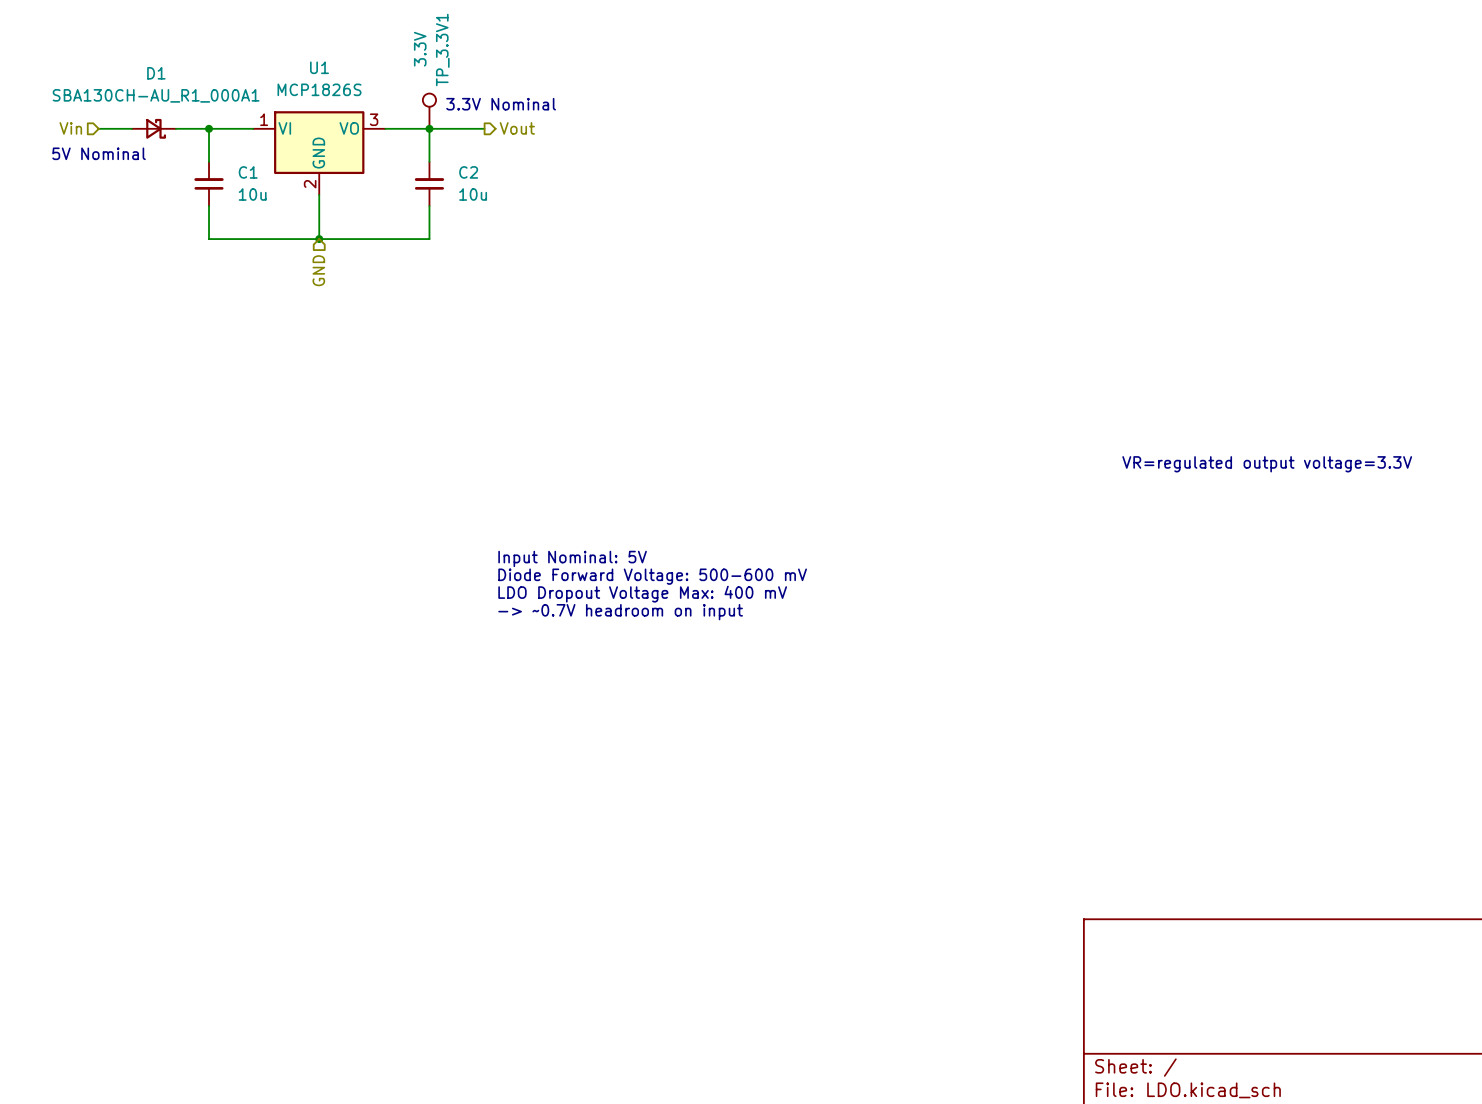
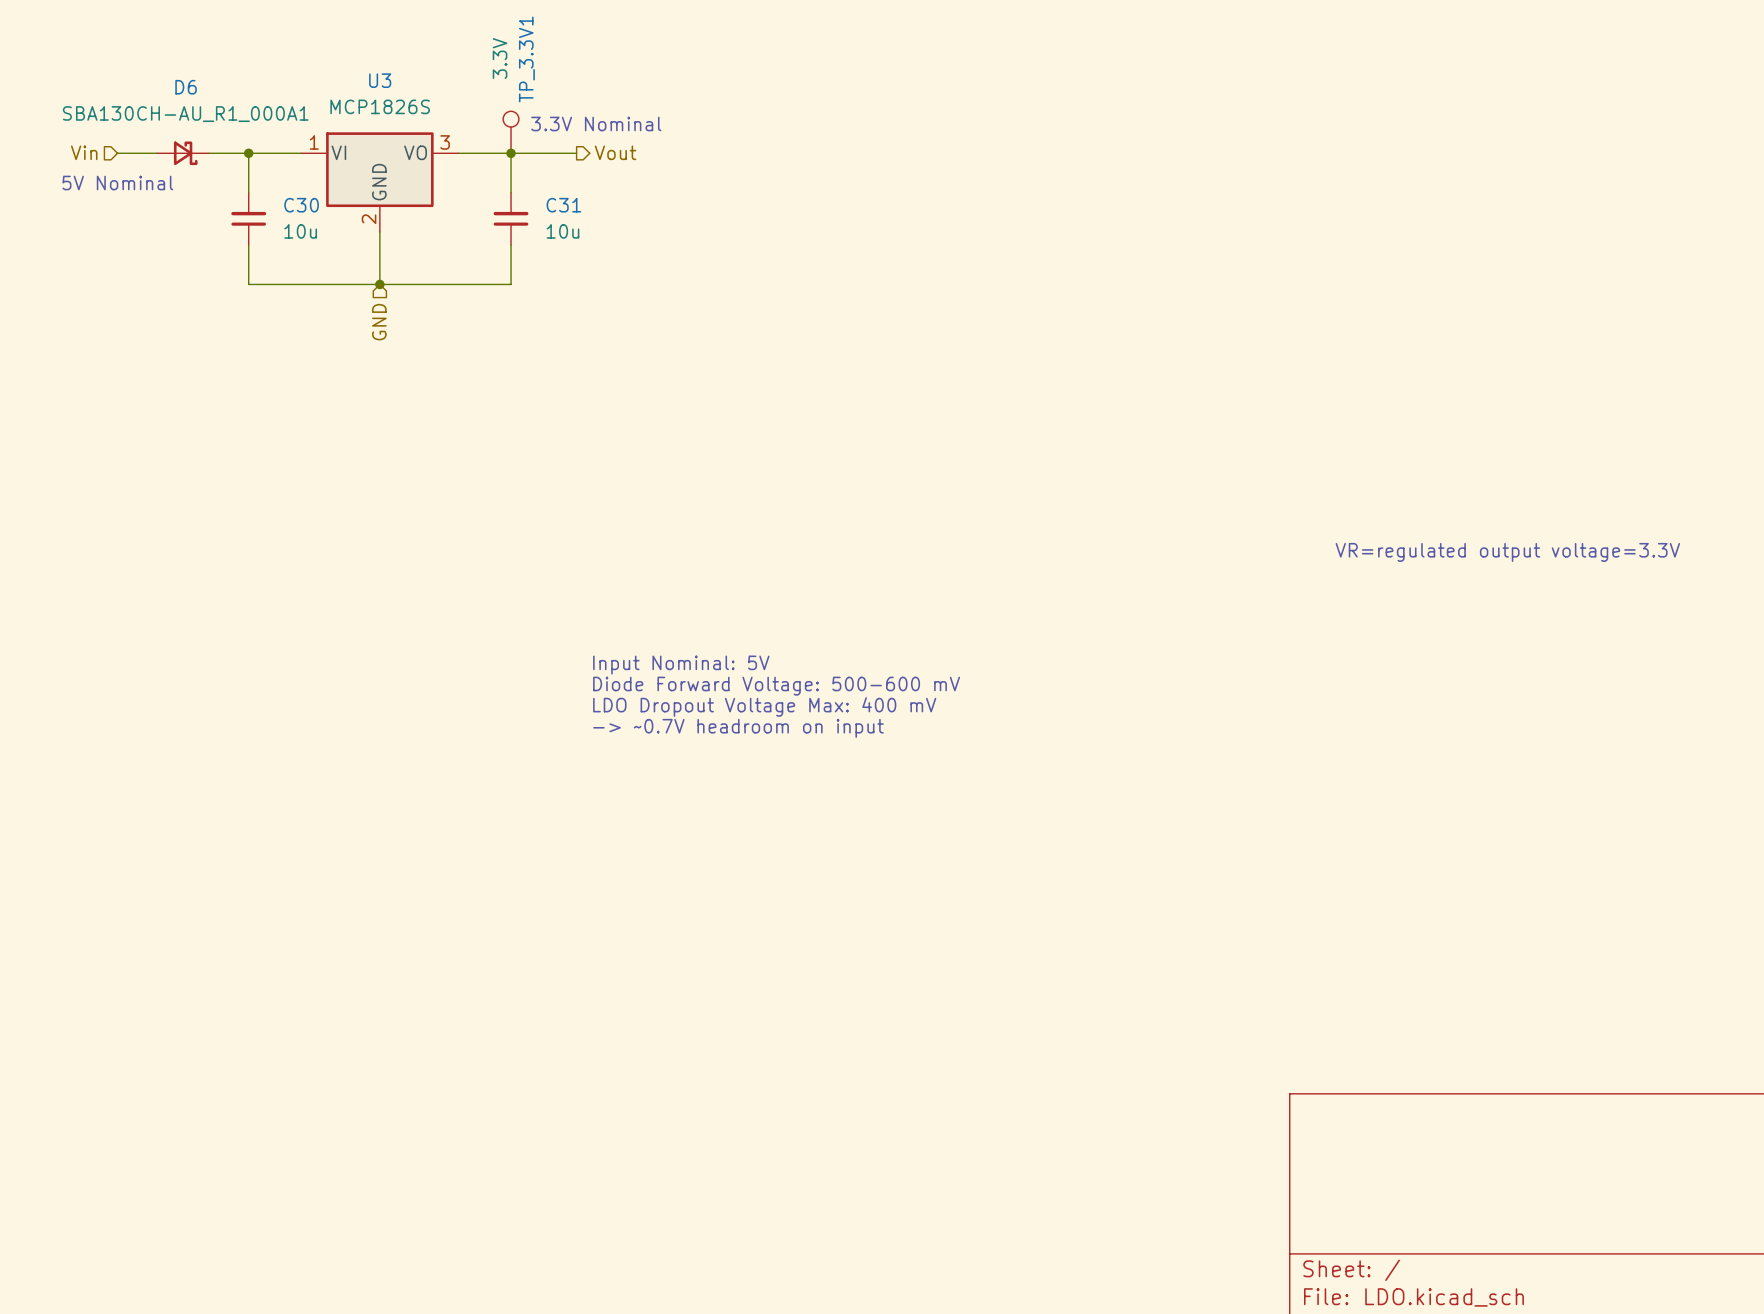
U1 name: U1 (319, 67) -> U3 (380, 80)
D1 name: D1 (156, 73) -> D6 (186, 87)
C1 name: C1 (248, 172) -> C30 (301, 205)
C2 name: C2 (468, 172) -> C31 (563, 205)

